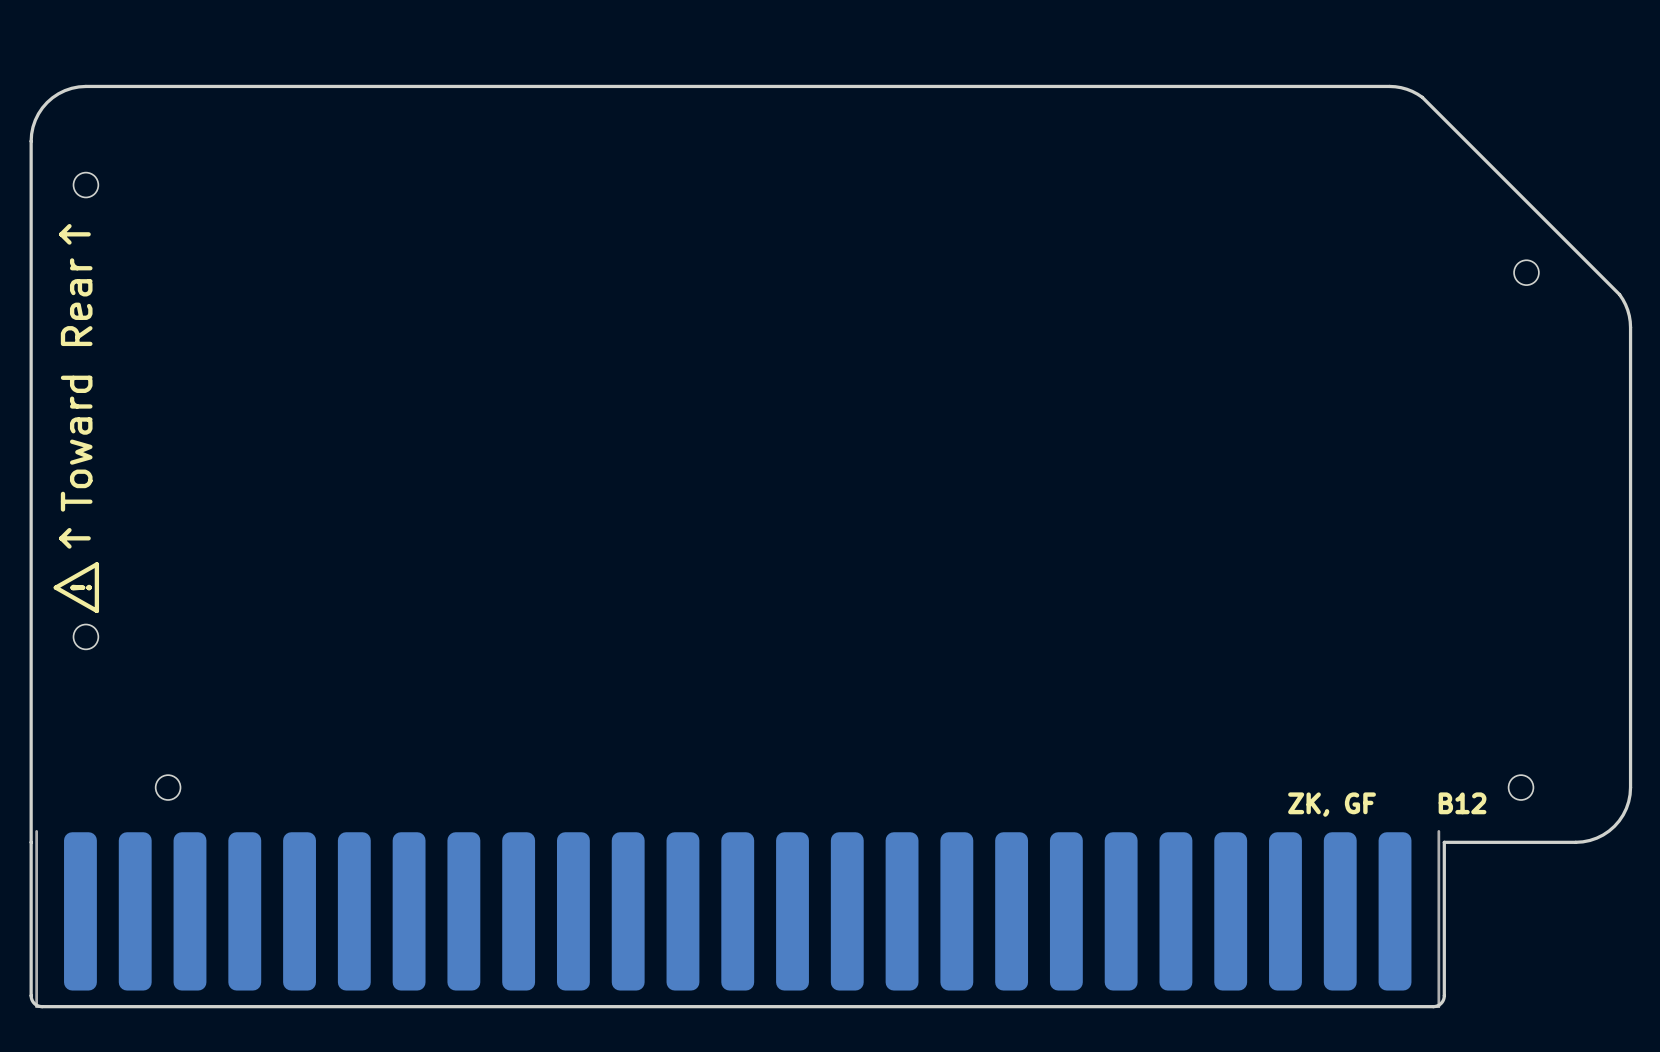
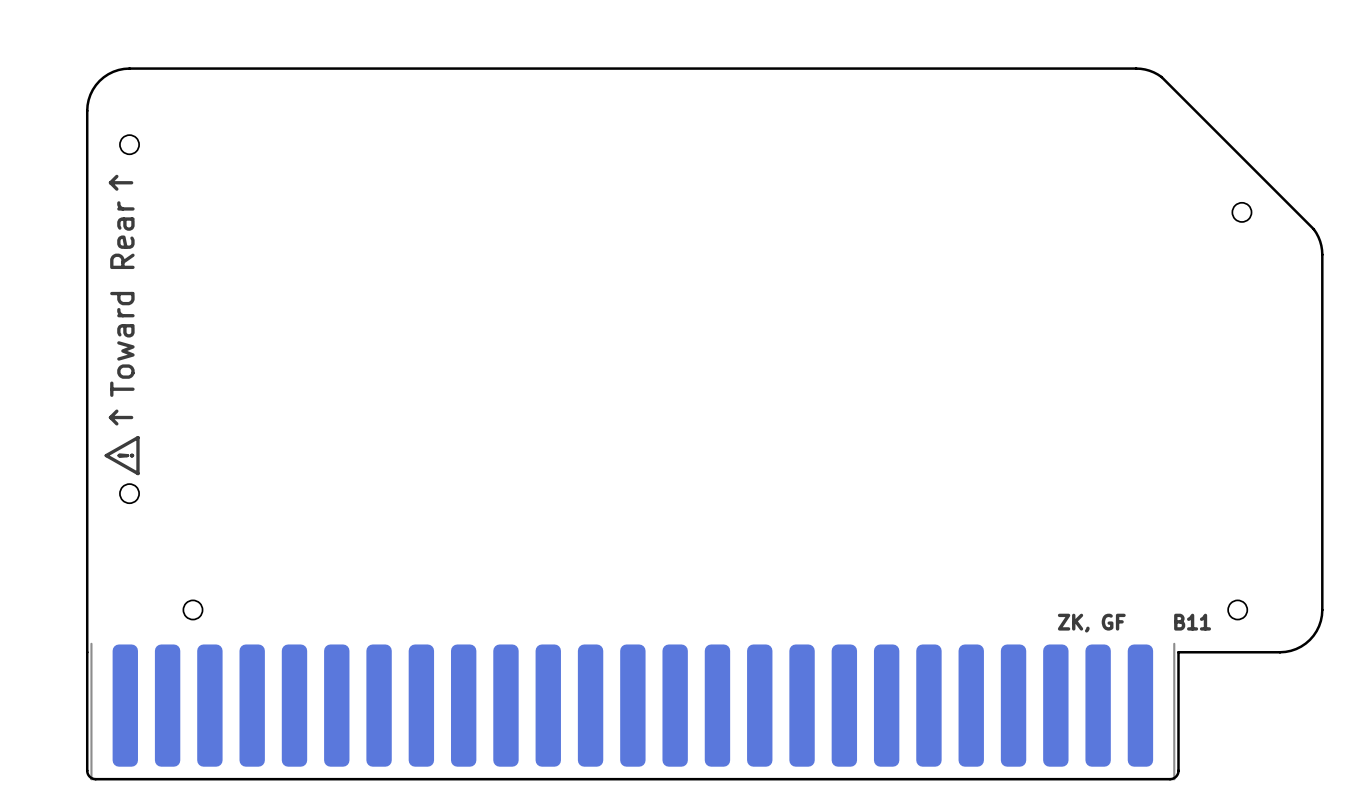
text: B12 (1462, 803) -> B11 (1192, 622)

